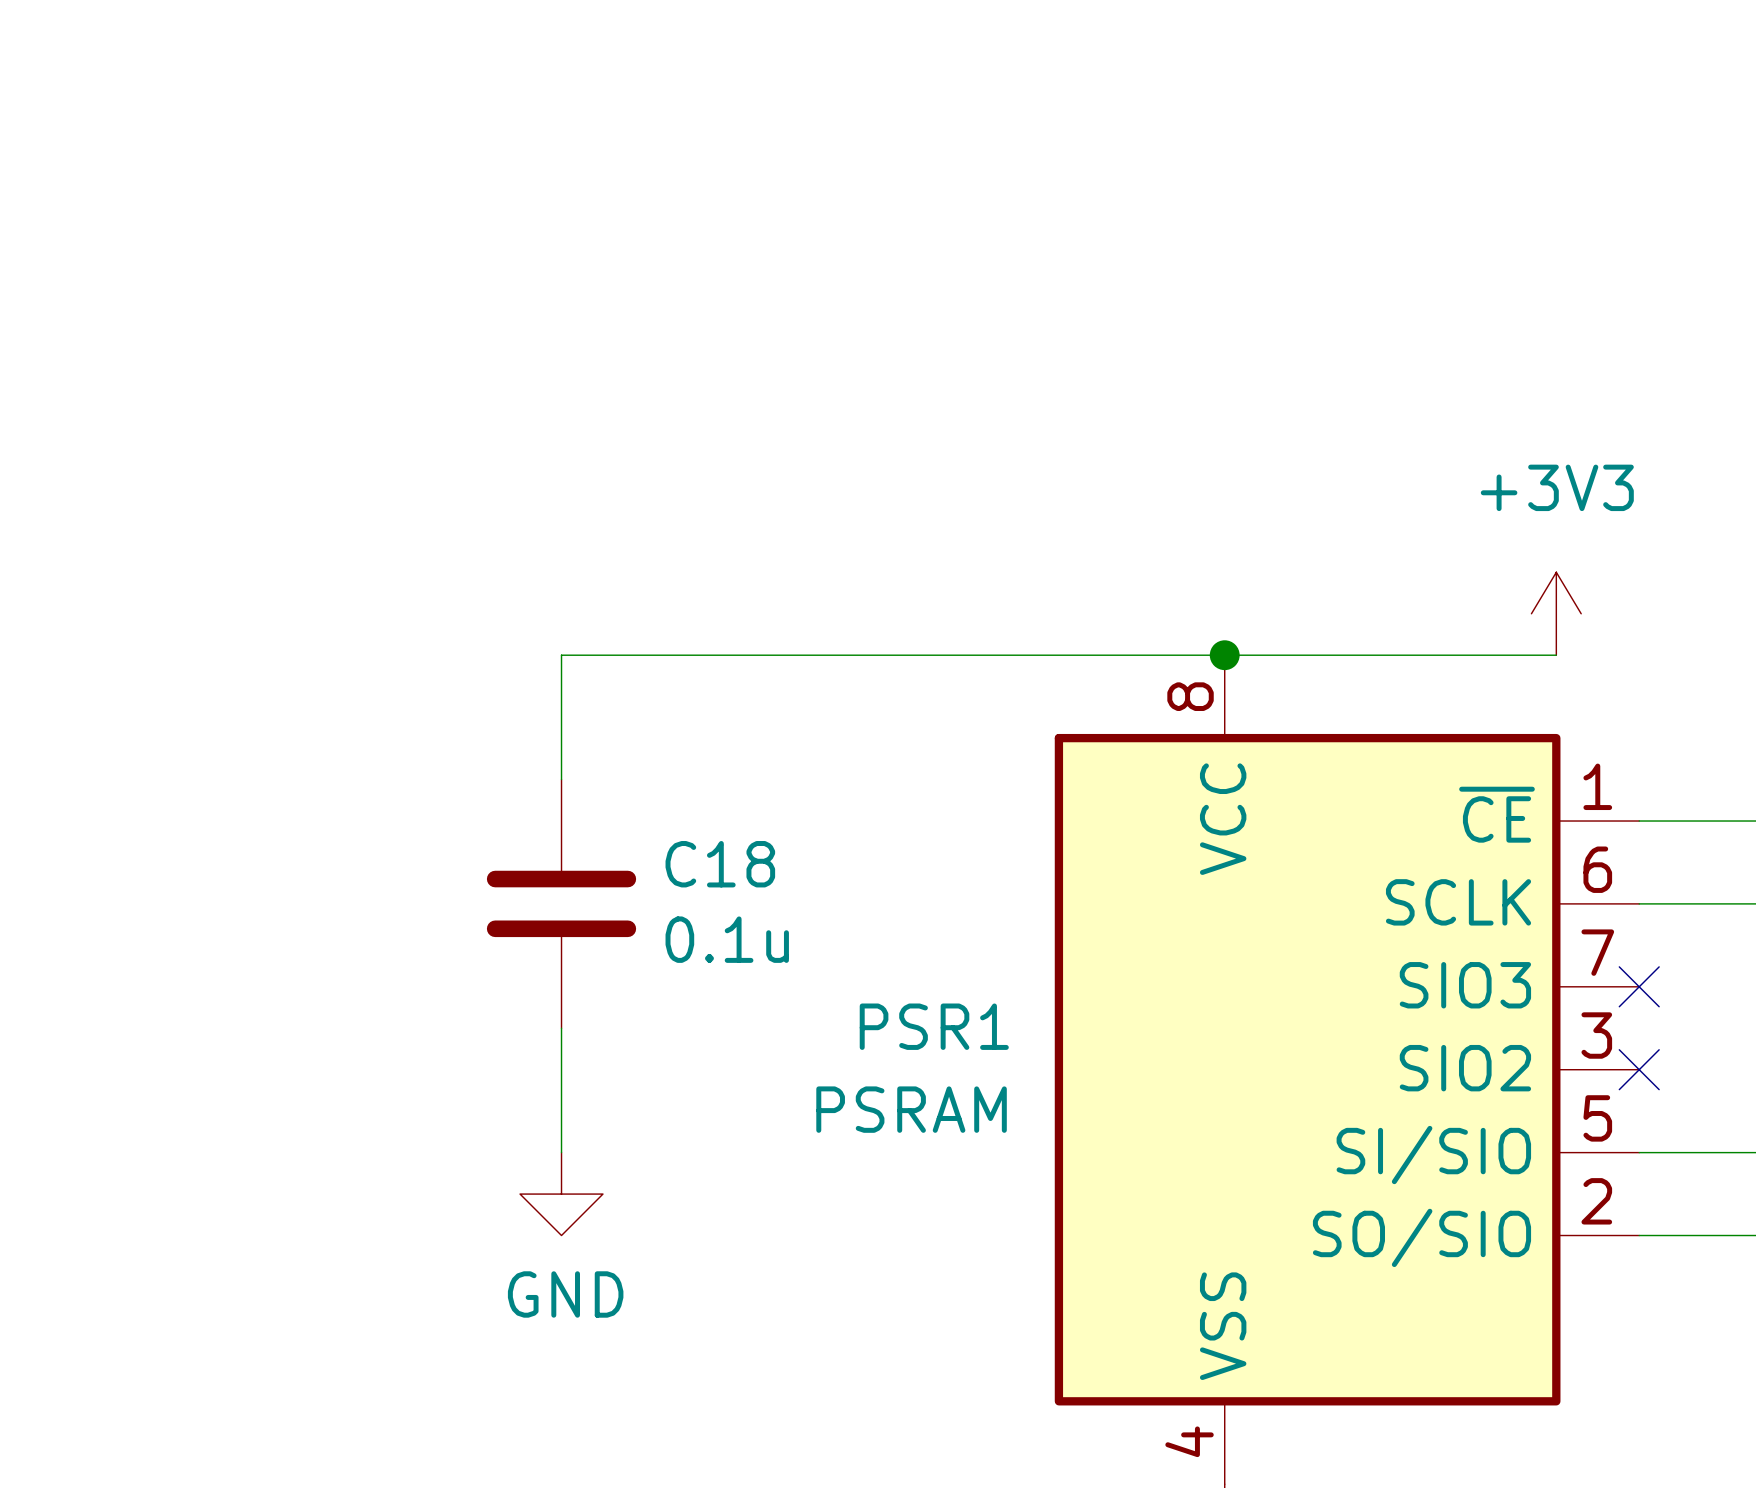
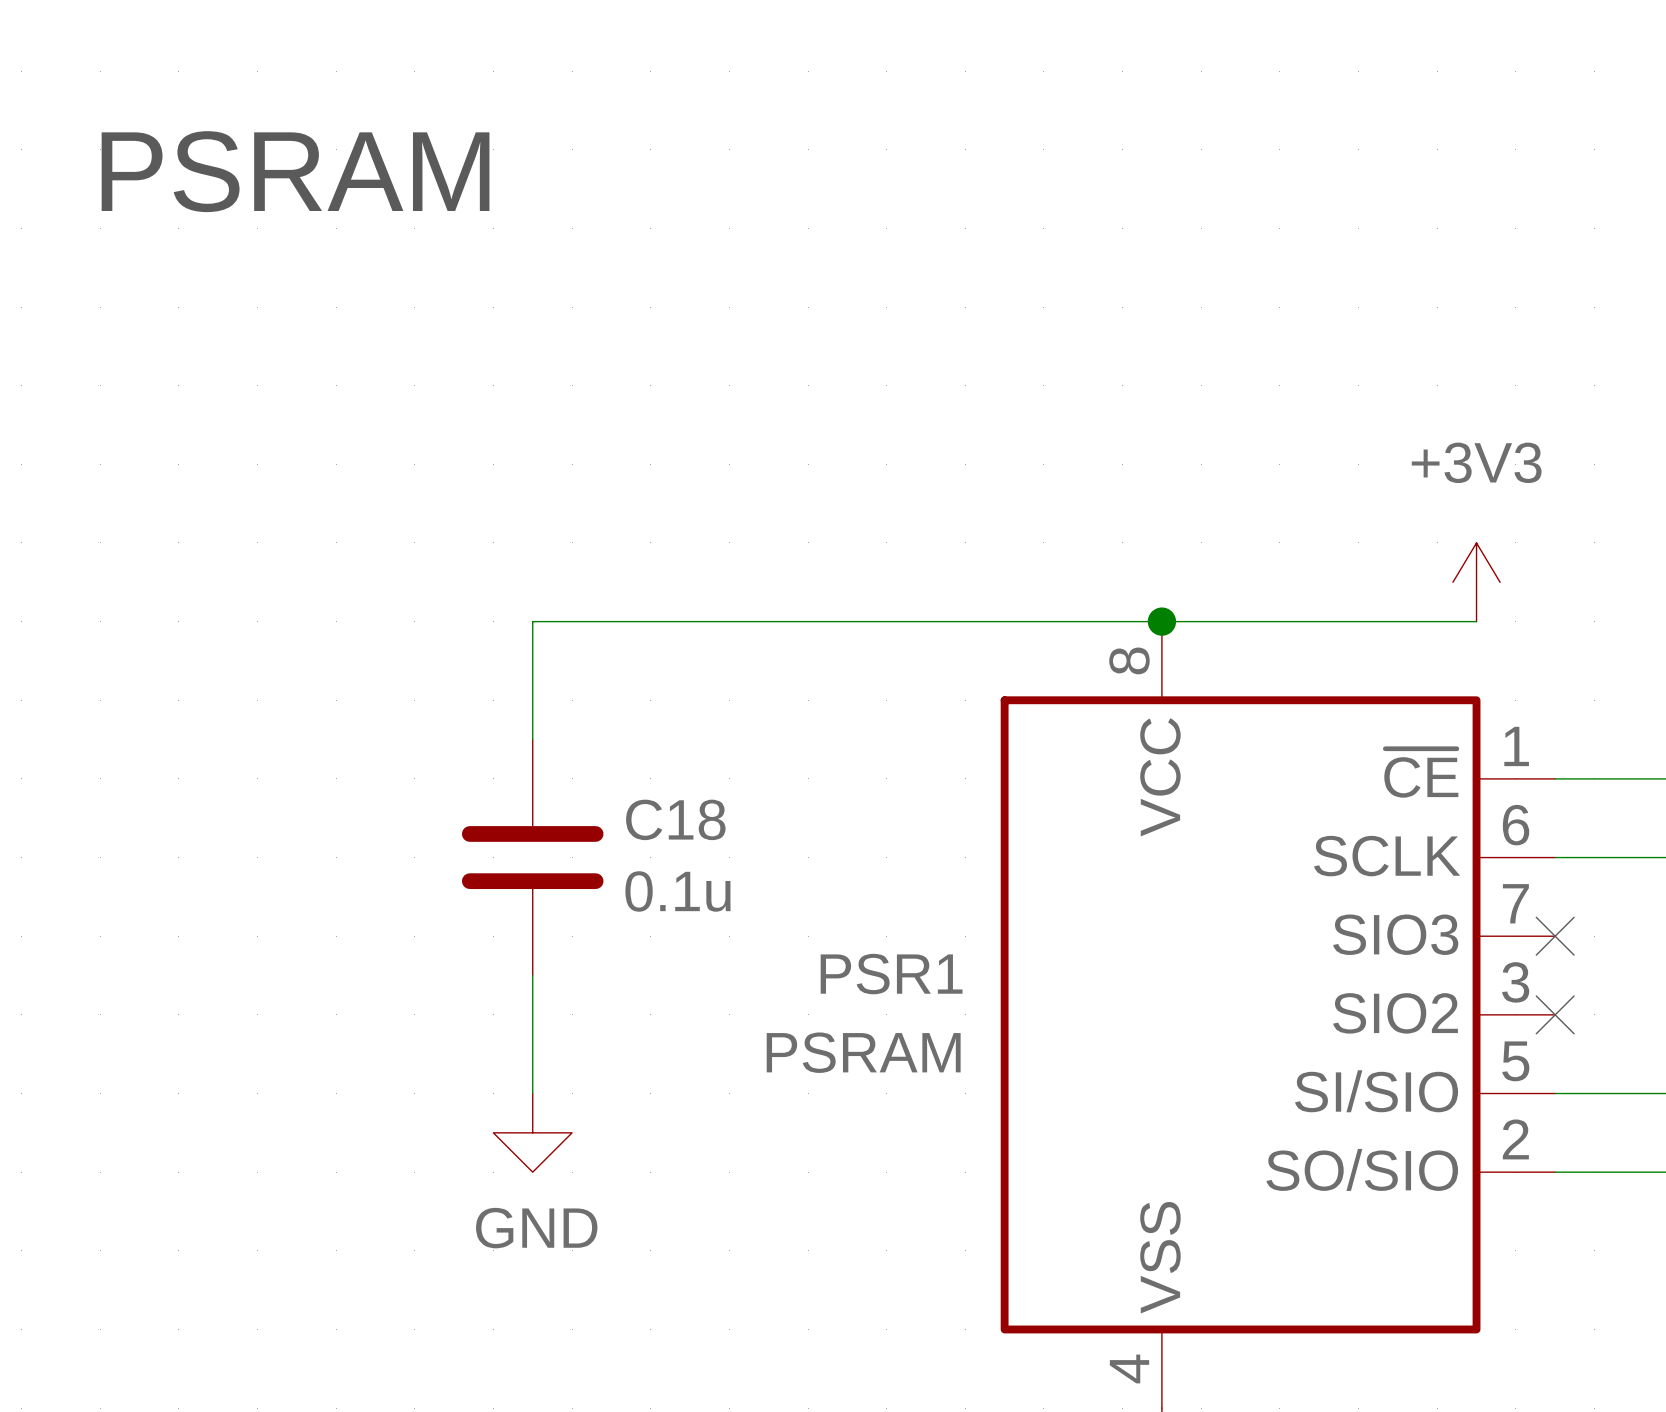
text: none -> PSRAM (295, 171)

